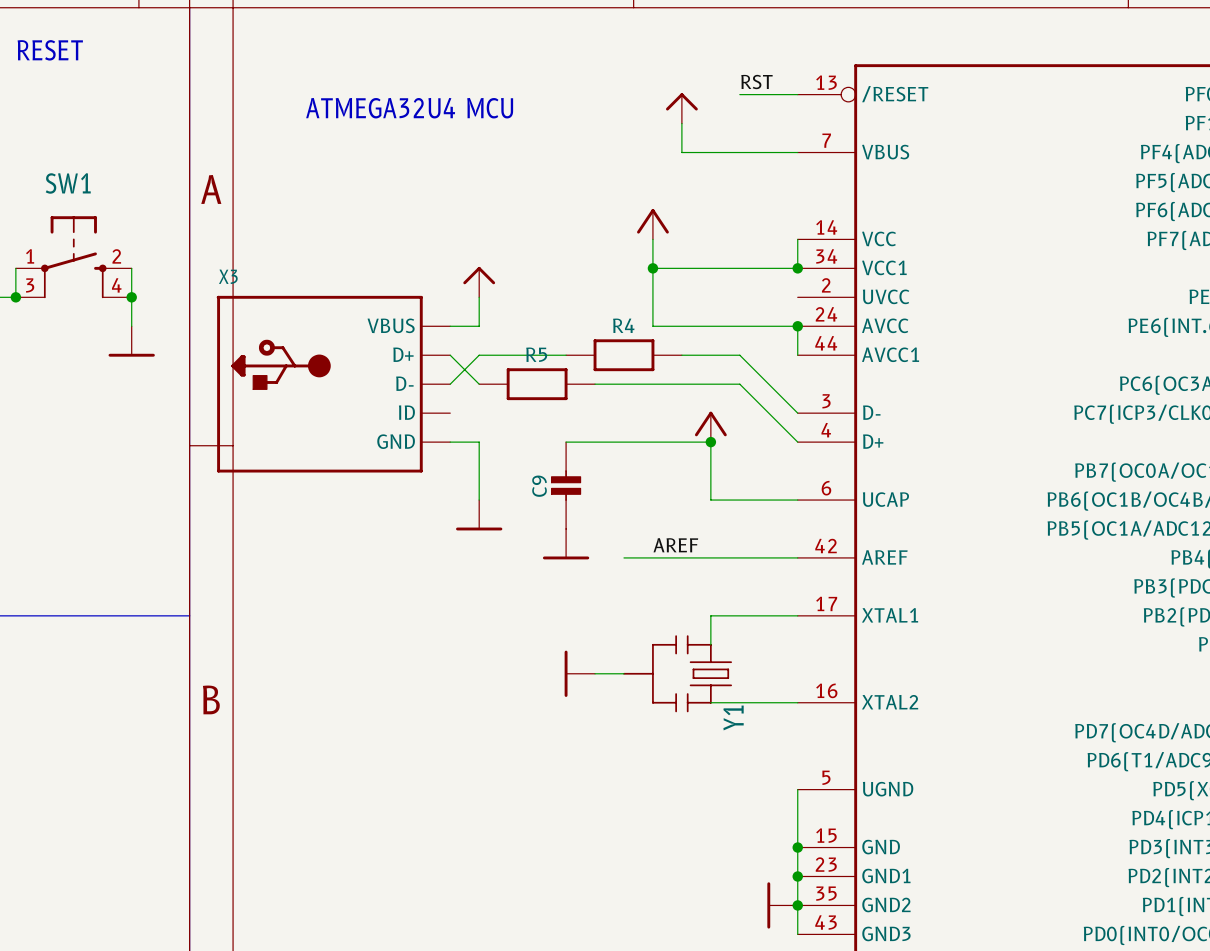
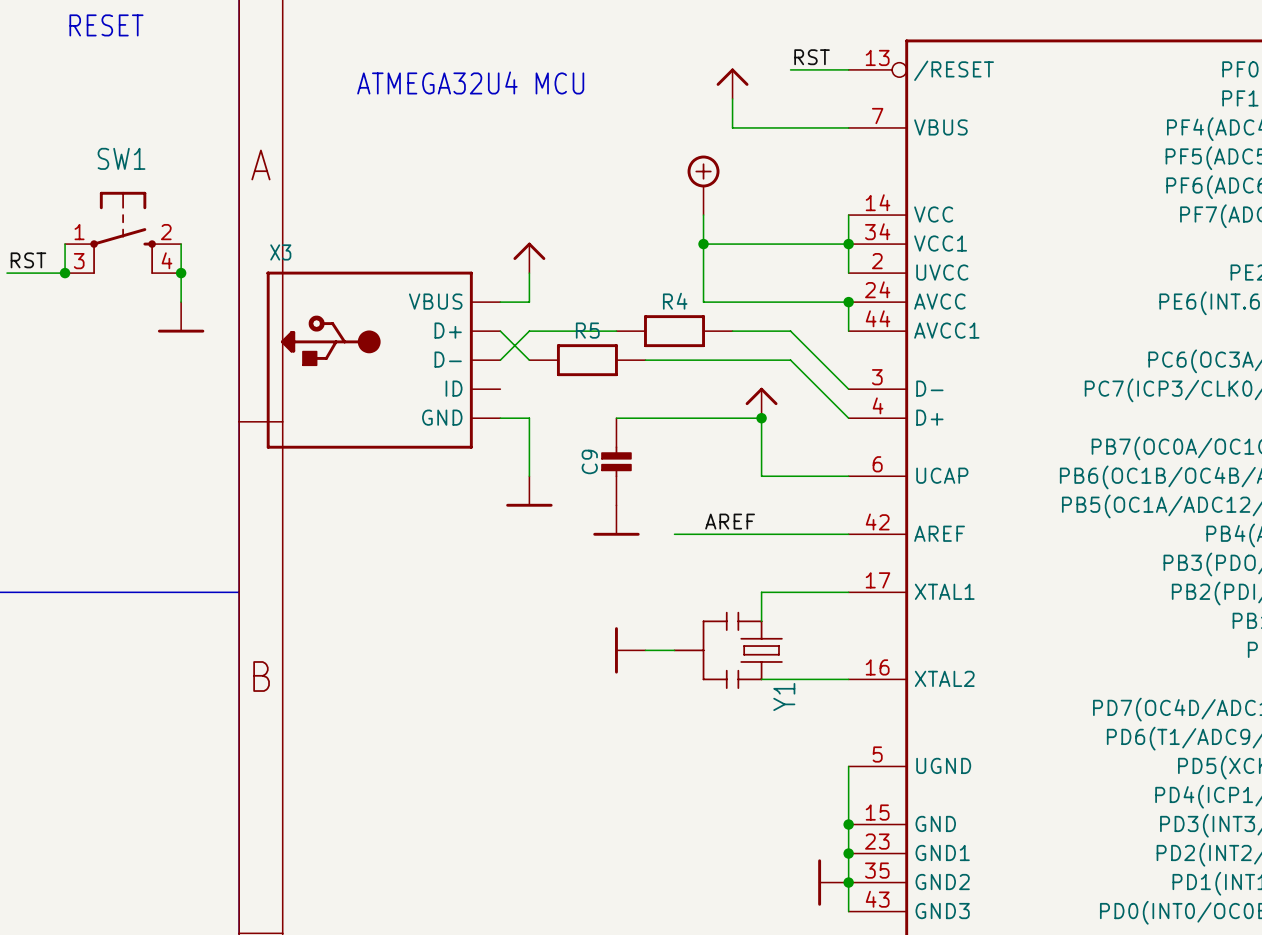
power symbol: none -> (703, 185)
power symbol: (652, 224) -> none
wire: none -> (848, 244) (848, 273)
power symbol shape: [694, 411, 727, 443] -> [745, 387, 778, 419]

